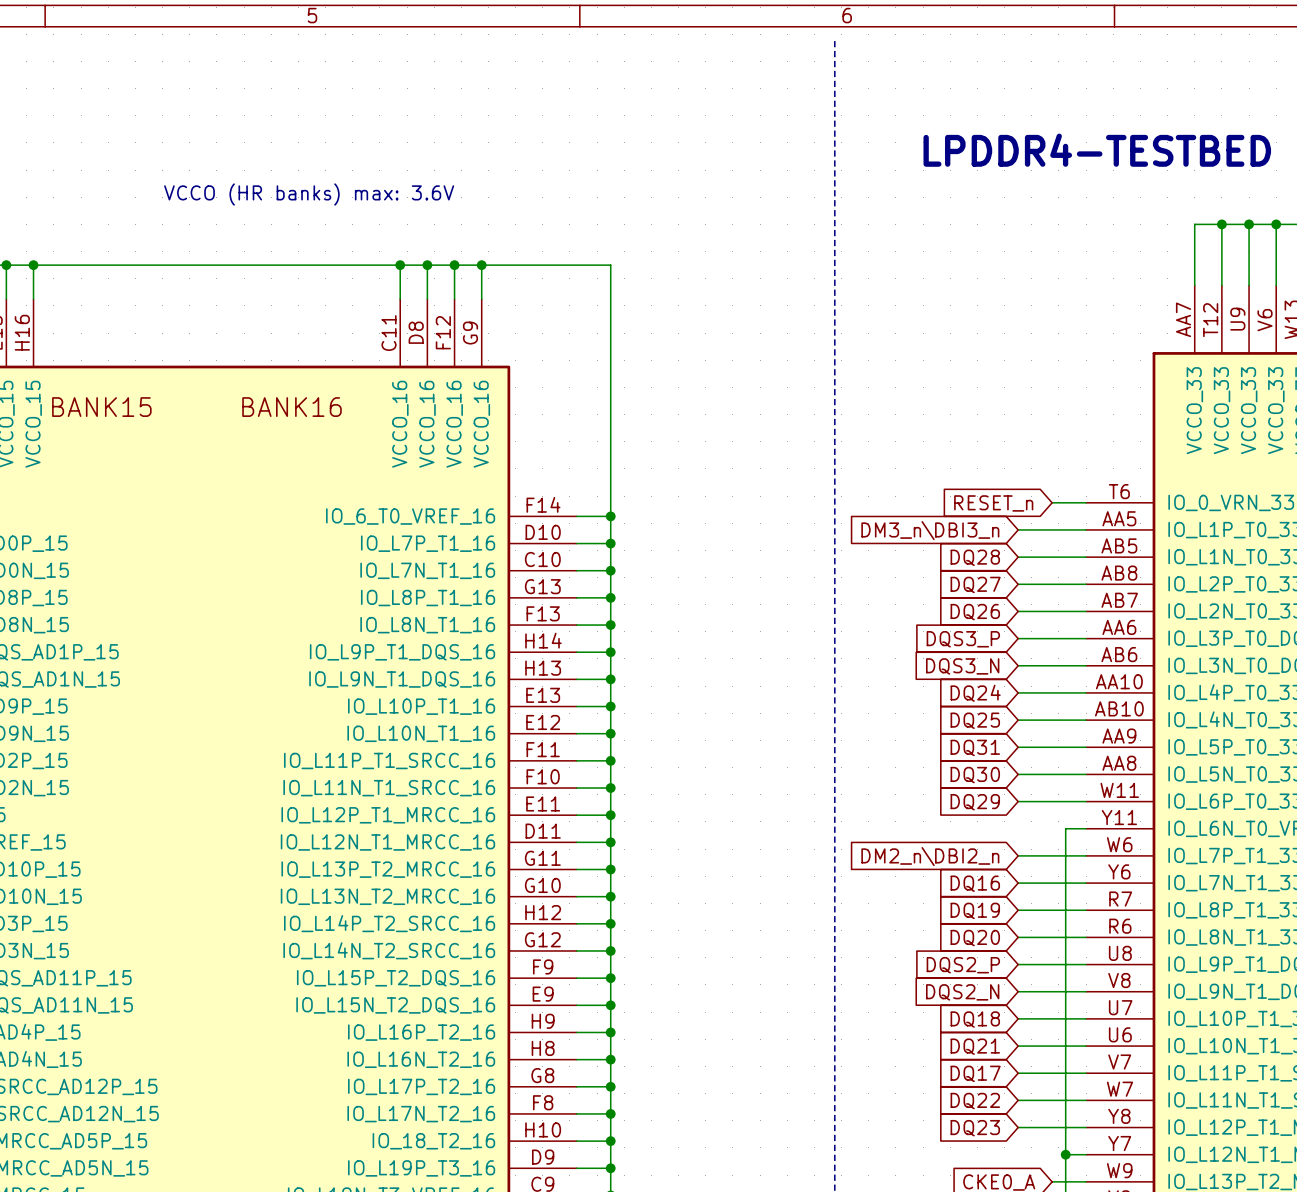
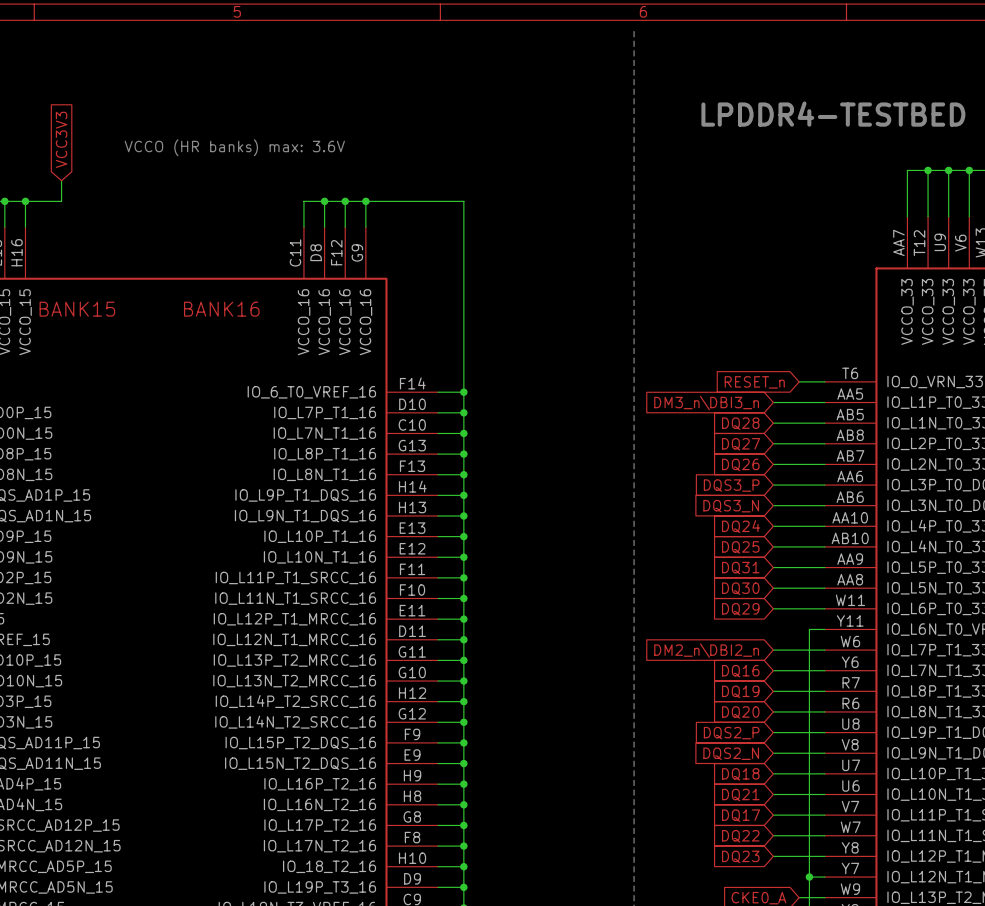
global label: none -> VCC3V3 (61, 139)
wire: (81, 265) (400, 265) -> (61, 201) (61, 180)
junction: (400, 265) -> none

